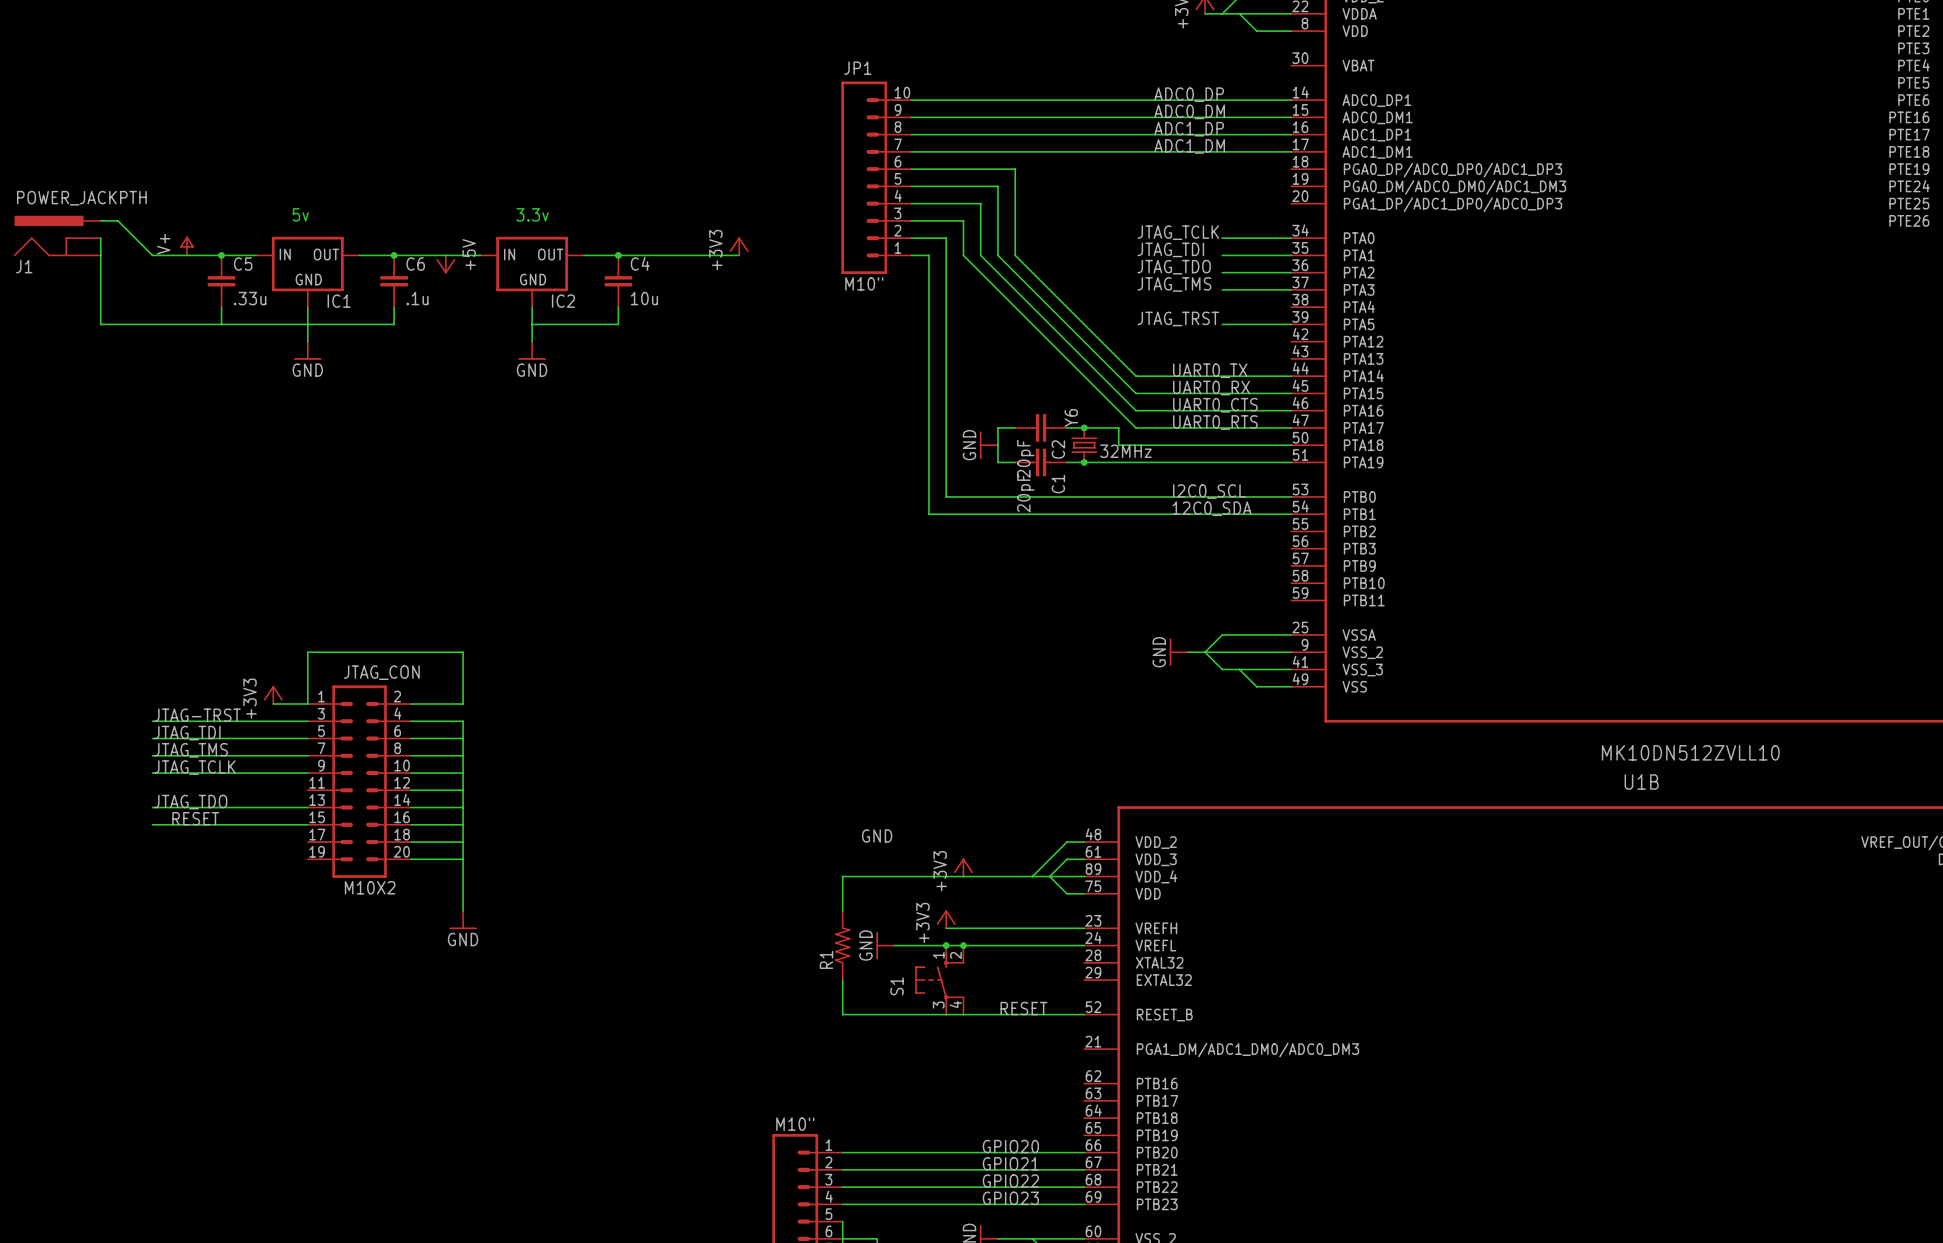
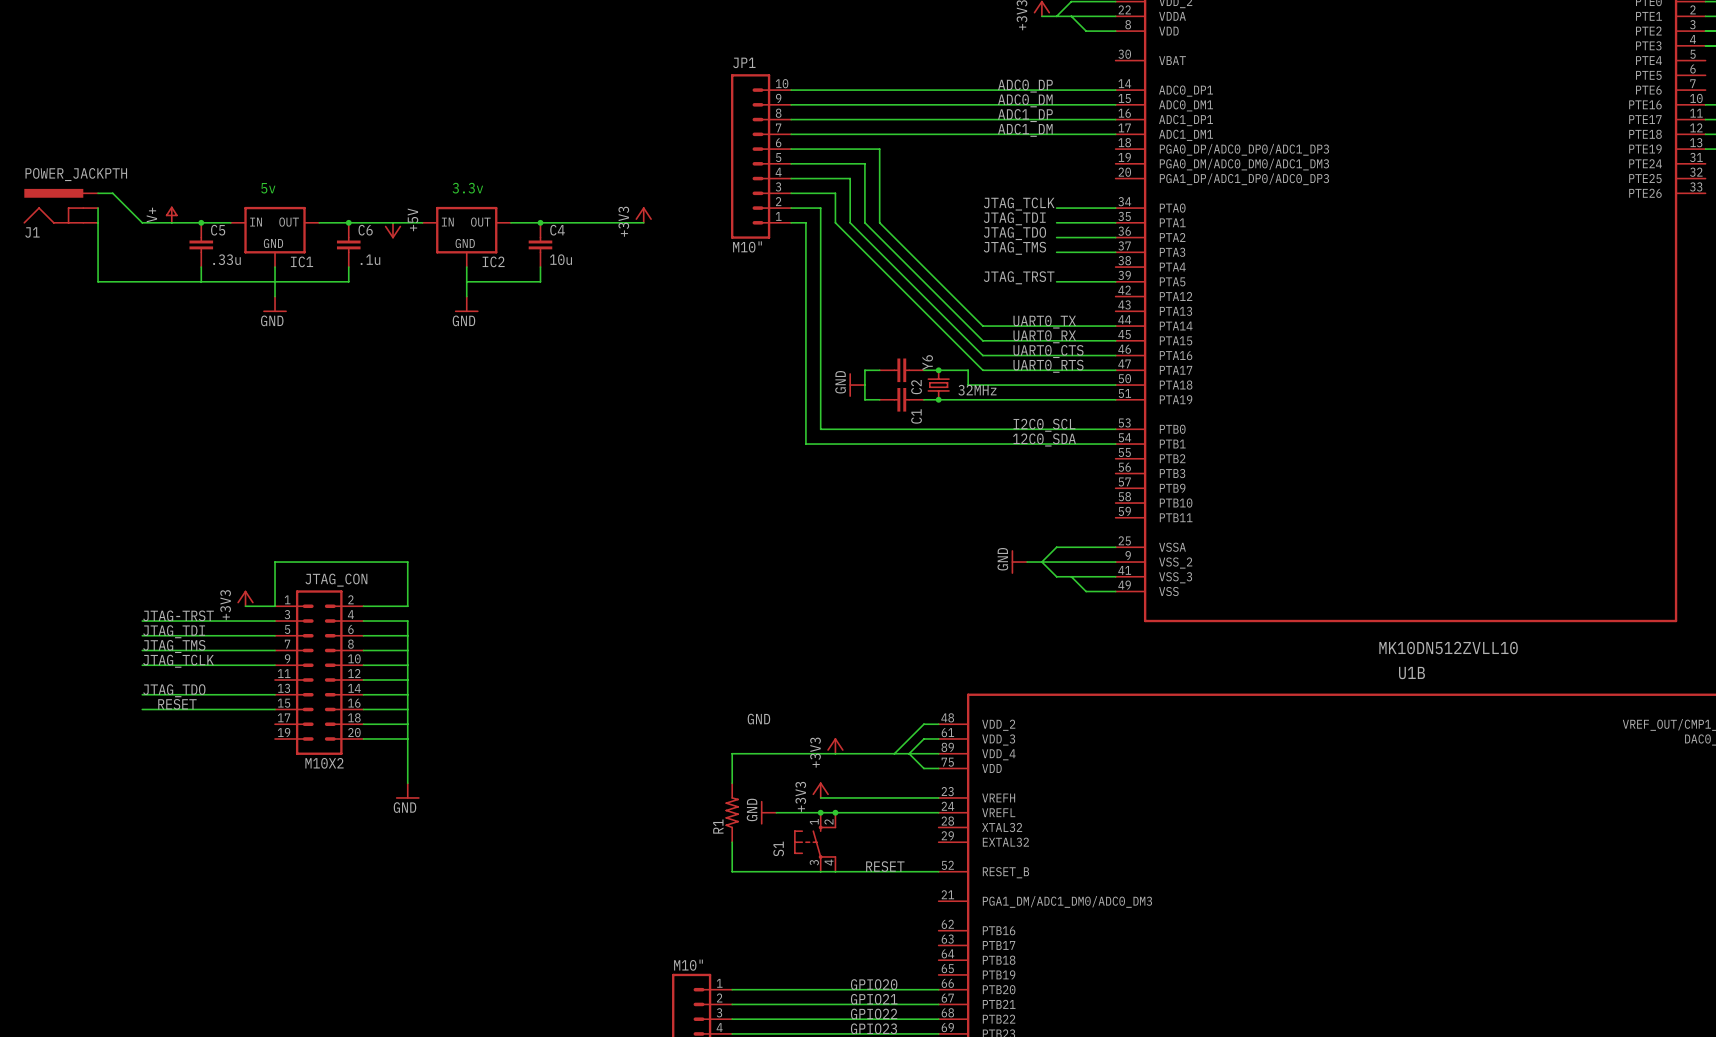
C2 value: 20pF (1025, 458) -> none
C1 value: 20pF (1025, 493) -> none

